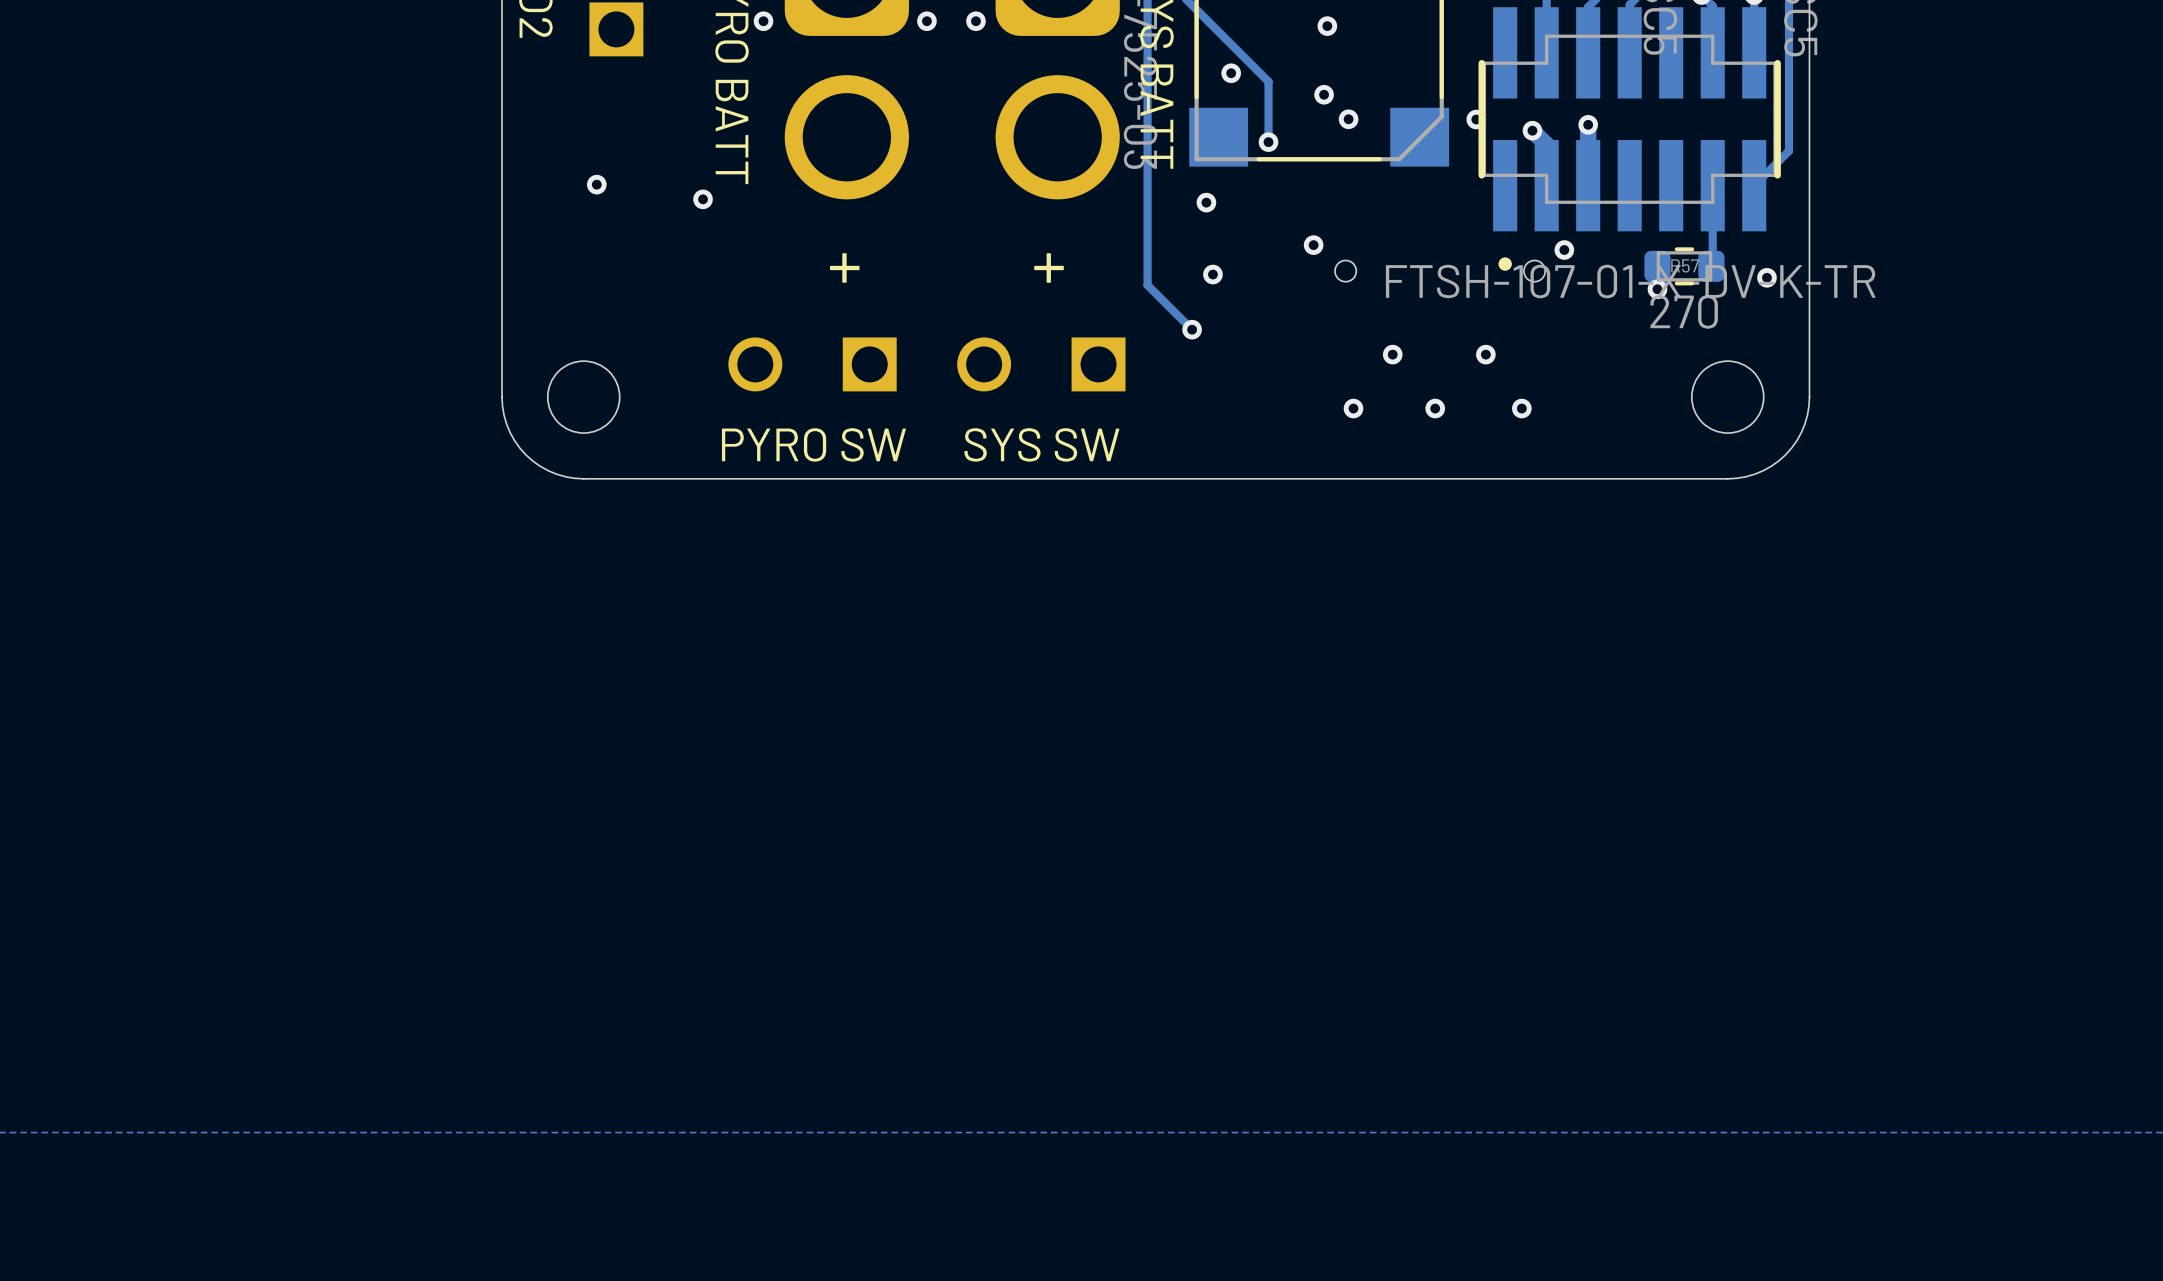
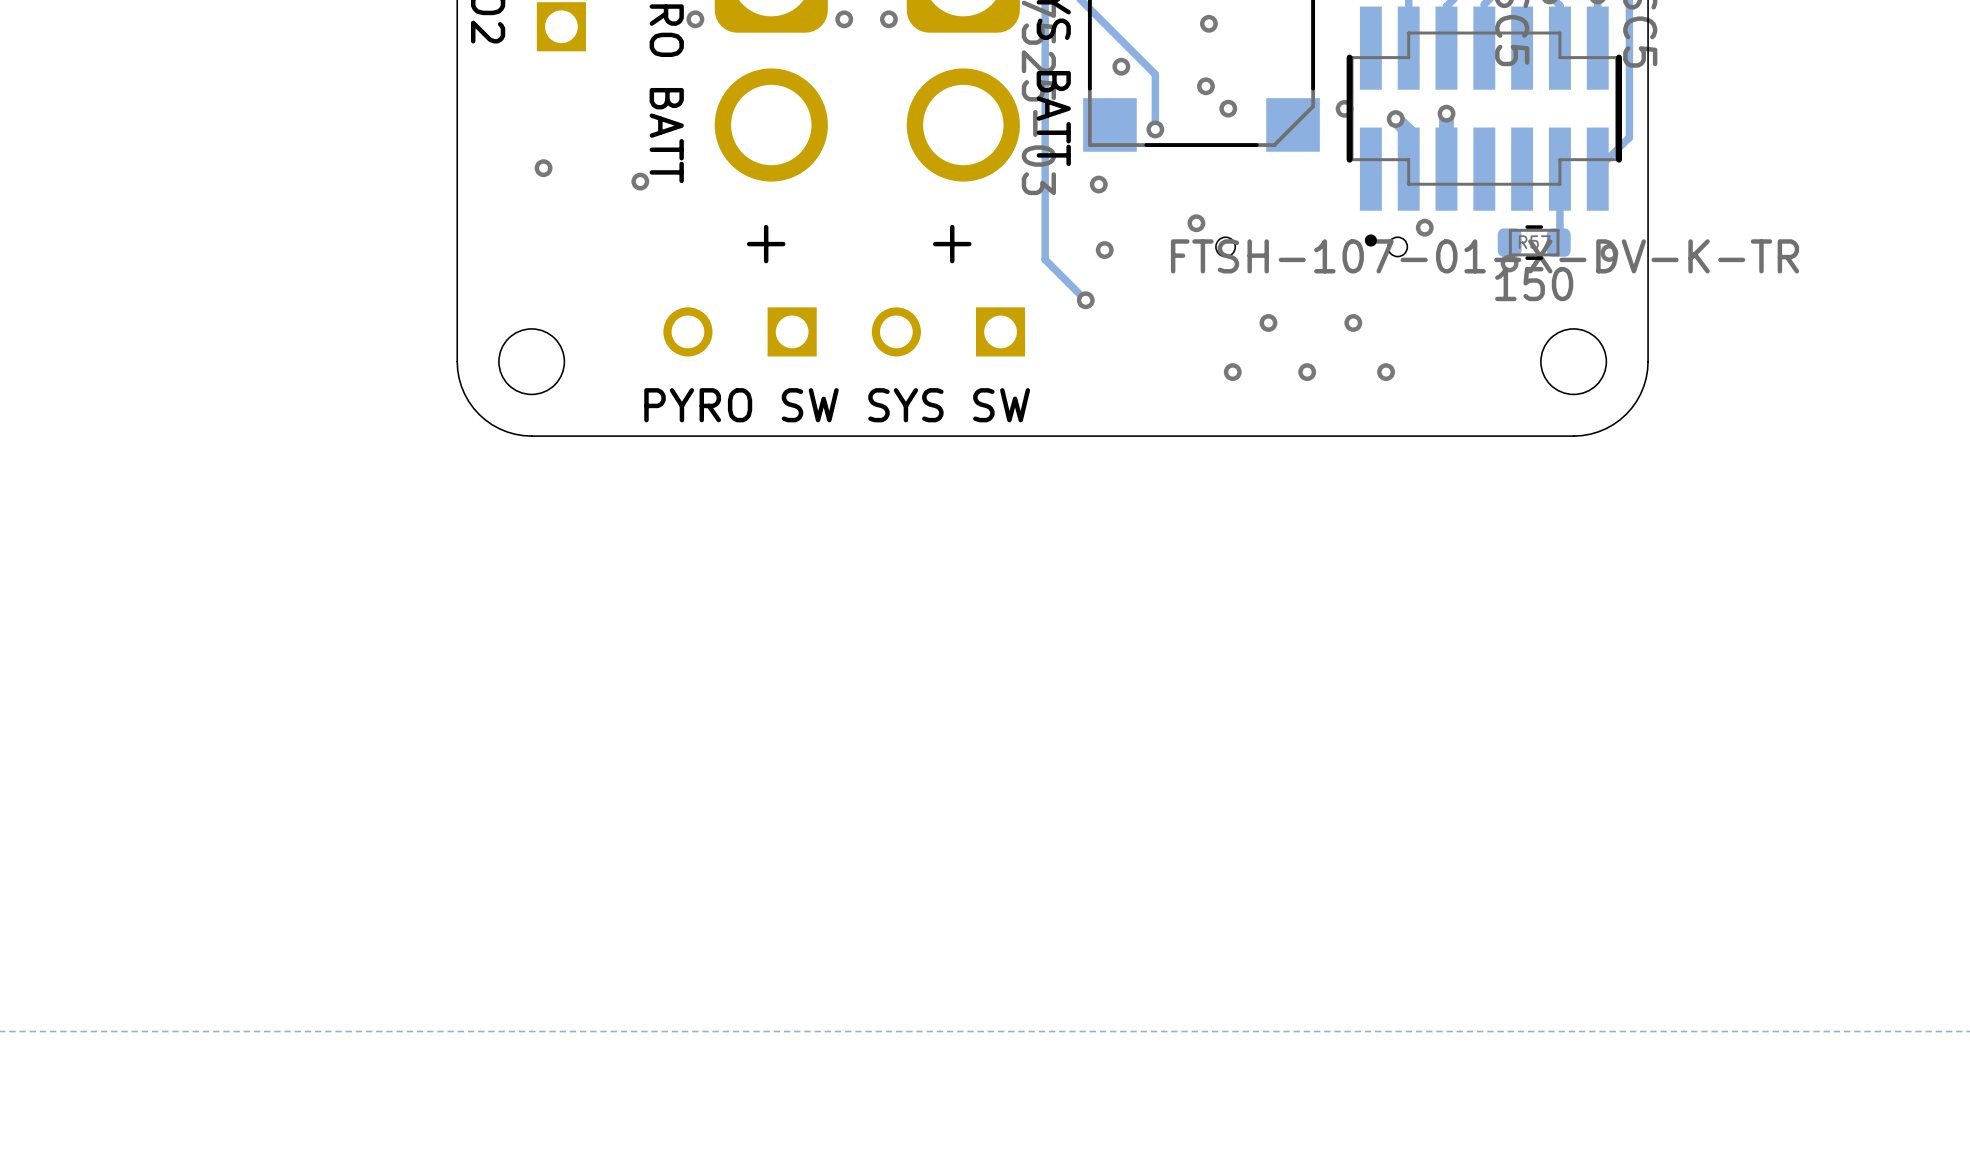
R57 value: 270 (1684, 311) -> 150 (1534, 284)

